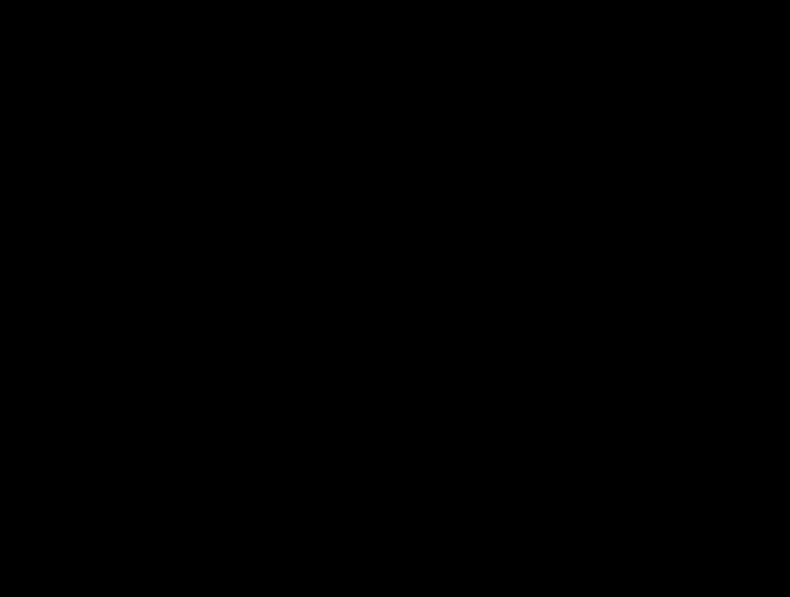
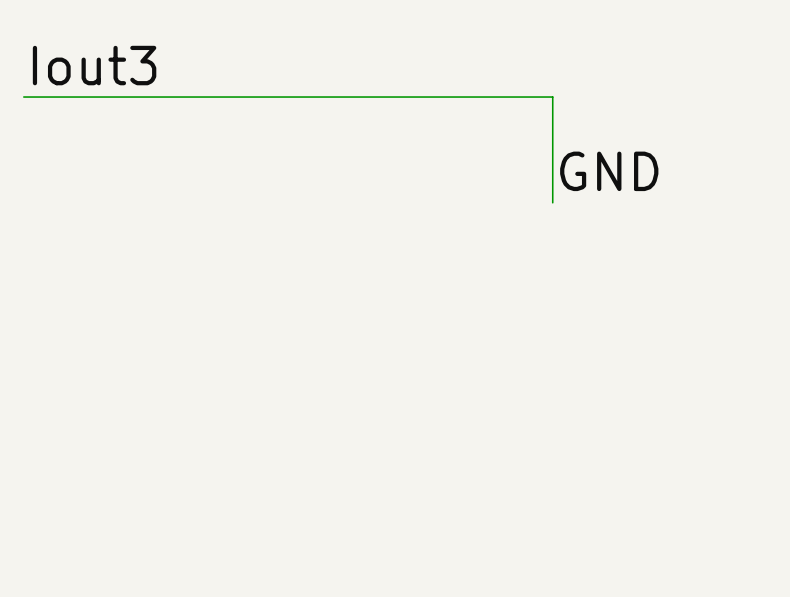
label: none -> Iout3 (94, 65)
wire: none -> (23, 97) (552, 97) (552, 202)
label: none -> GND (609, 171)

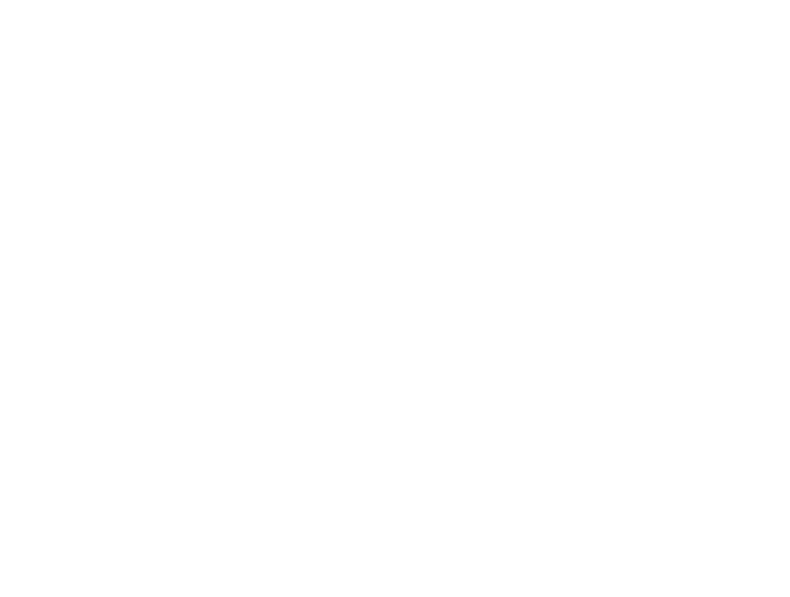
label: Iout3 (94, 65) -> none
wire: (23, 97) (552, 97) (552, 202) -> none
label: GND (609, 171) -> none

